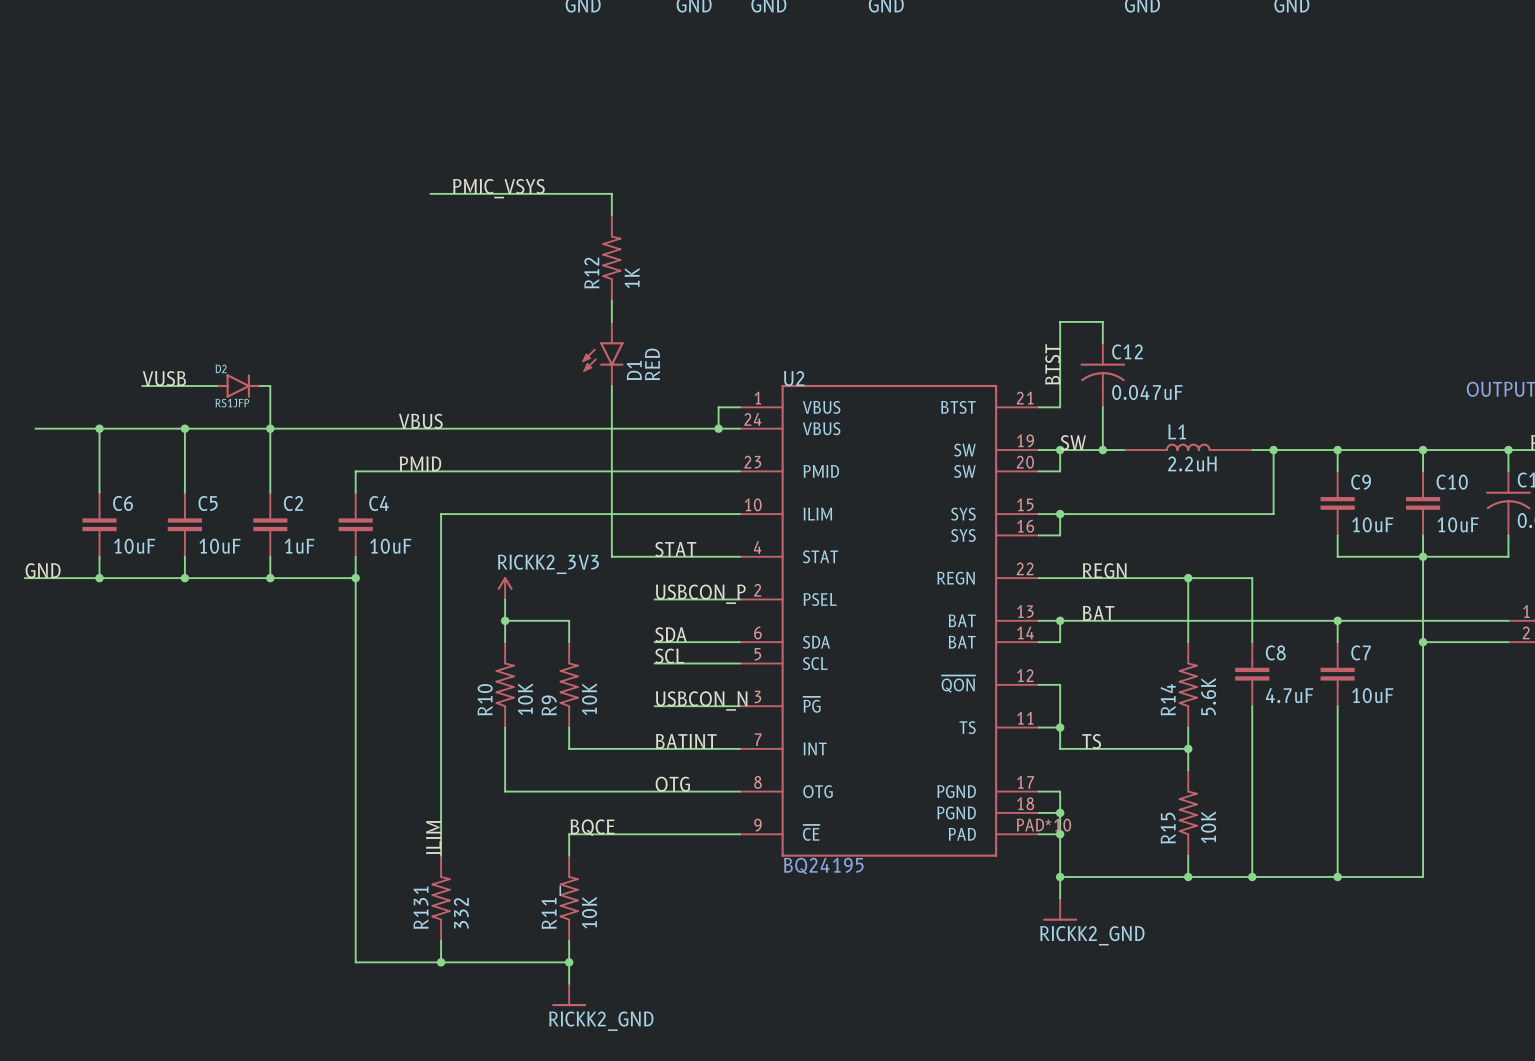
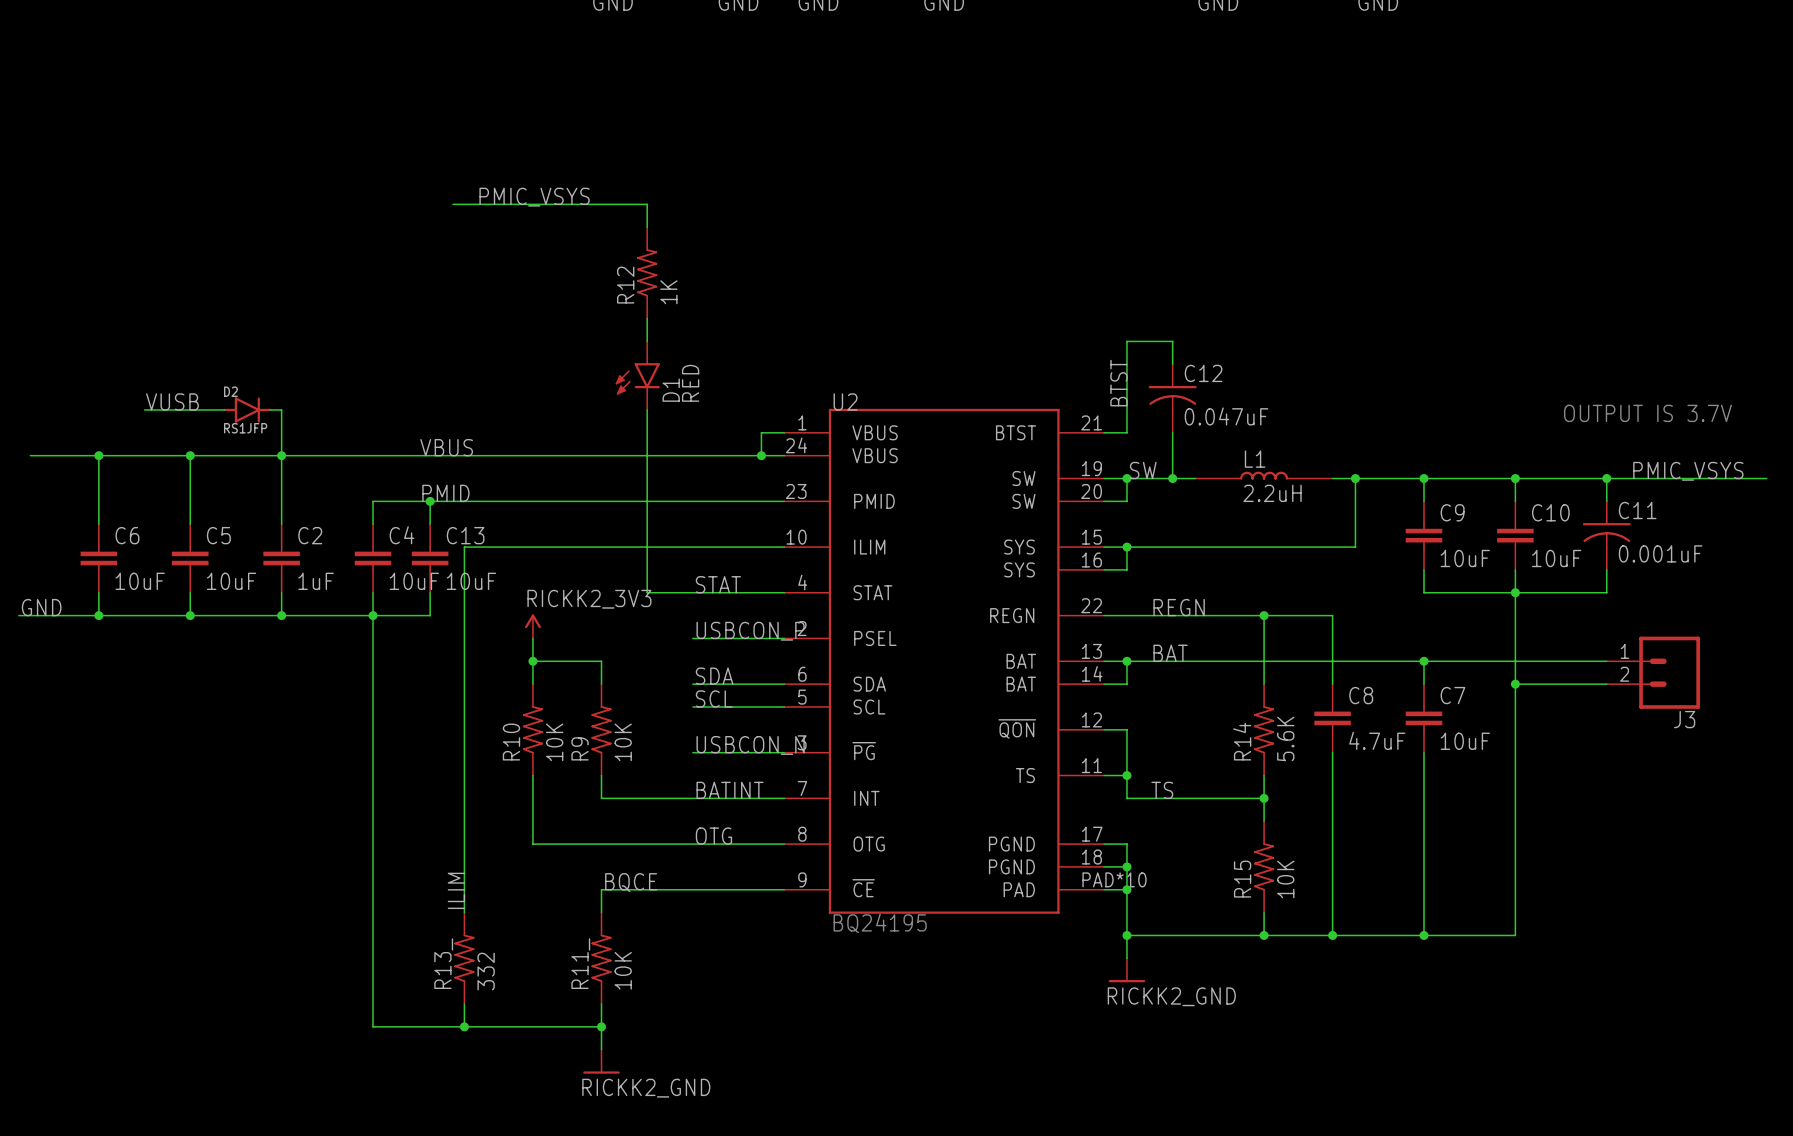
wire: none -> (430, 501) (430, 524)
junction: none -> (430, 501)
C13: none -> 10uF (430, 558)
wire: none -> (430, 592) (430, 615) (373, 615)
R131 name: R131 (421, 907) -> R13_ (443, 963)

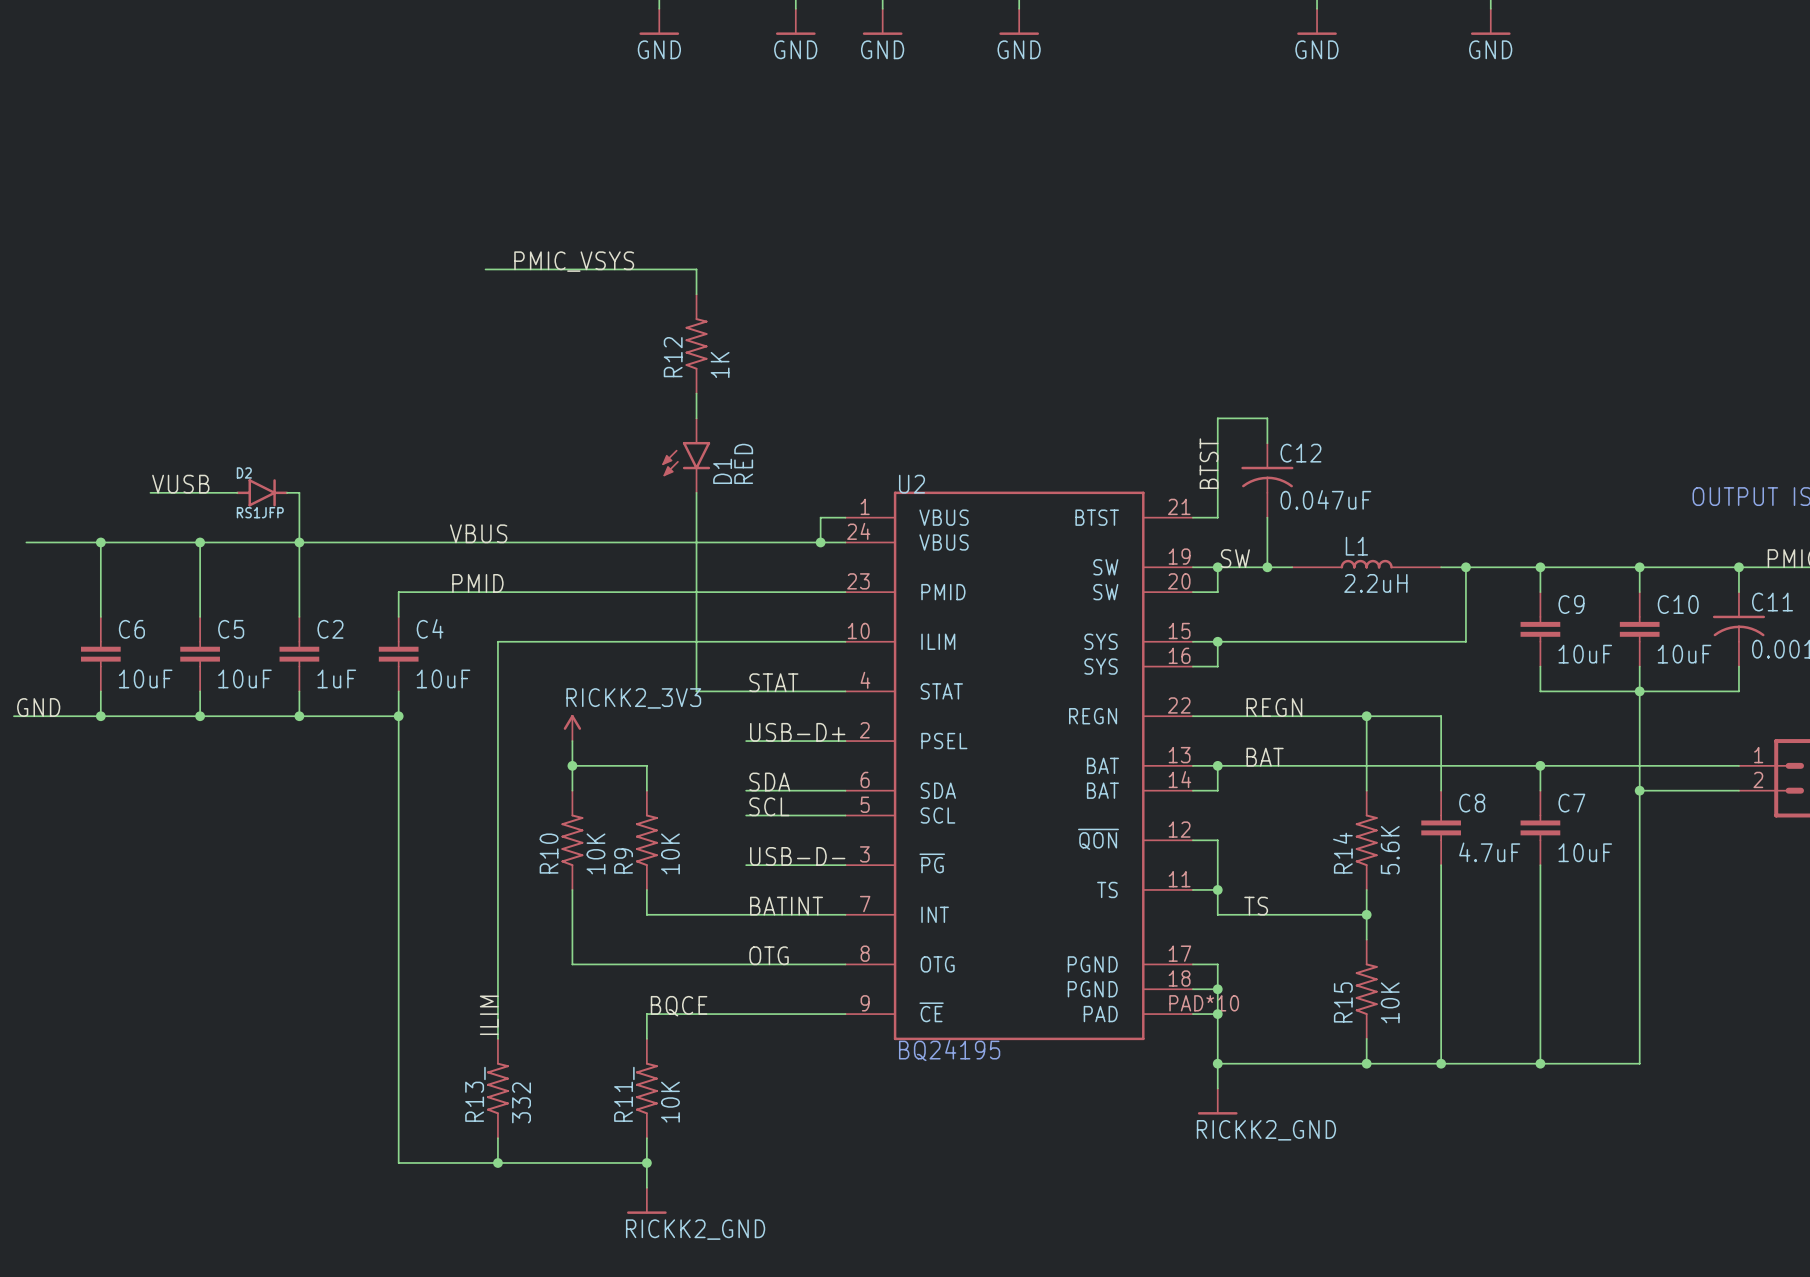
wire: (430, 501) (430, 524) -> none
junction: (430, 501) -> none
C13: 10uF (430, 558) -> none
wire: (430, 592) (430, 615) (373, 615) -> none
label: USBCON_P (750, 631) -> USB-D+ (797, 732)
label: USBCON_N (750, 745) -> USB-D- (797, 856)

